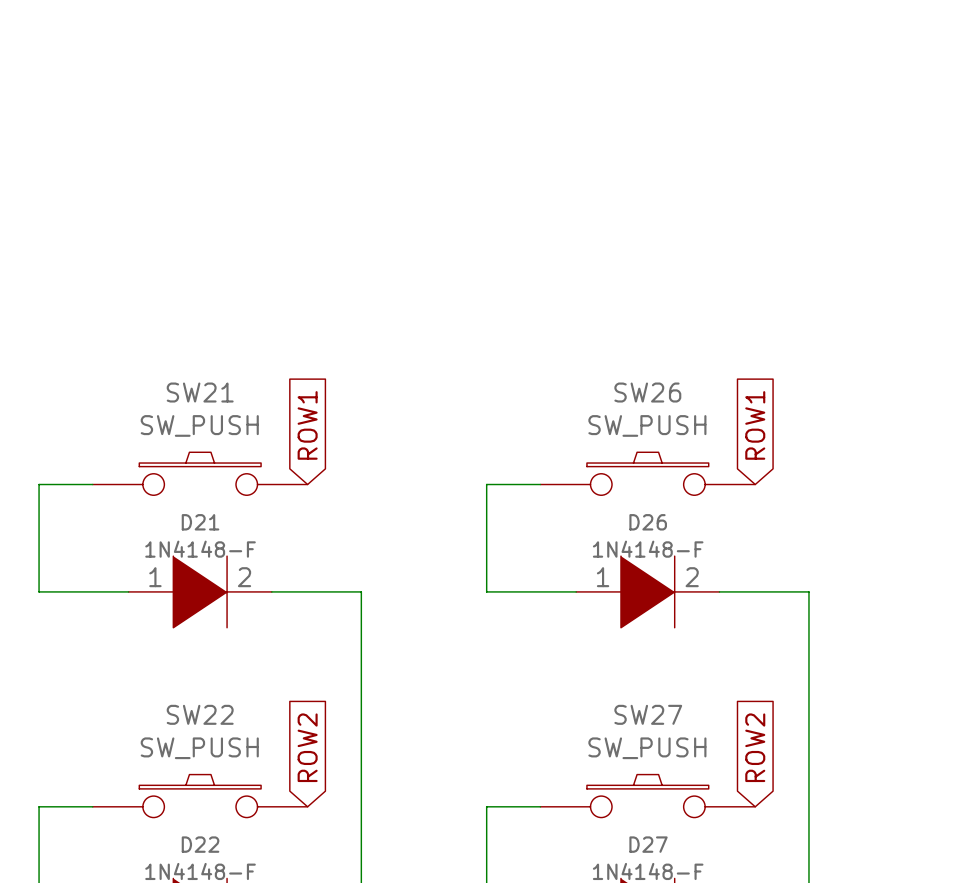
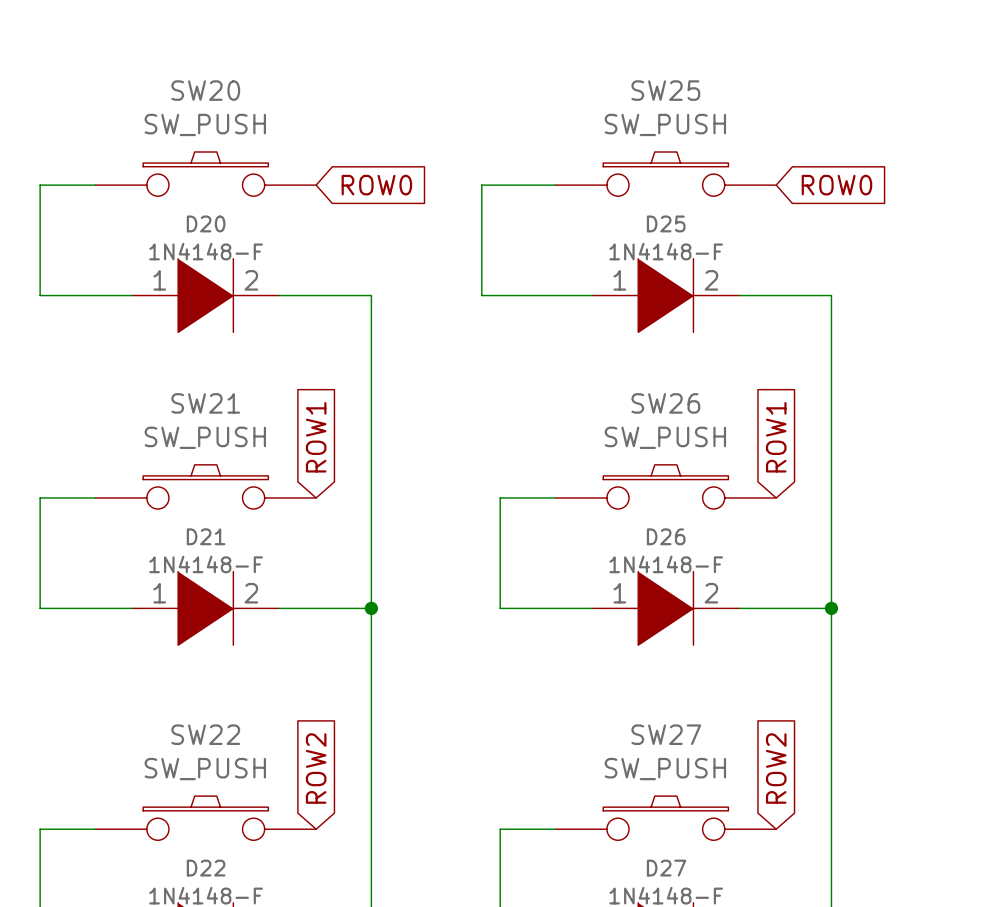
SW20: none -> SW_PUSH (205, 174)
SW25: none -> SW_PUSH (665, 174)
wire: none -> (95, 185) (40, 185) (40, 295) (132, 295)
global label: none -> ROW0 (376, 185)
wire: none -> (555, 185) (481, 185) (481, 295) (592, 295)
global label: none -> ROW0 (836, 185)
D20: none -> 1N4148-F (205, 295)
wire: none -> (279, 295) (371, 295) (371, 608)
D25: none -> 1N4148-F (665, 295)
wire: none -> (739, 295) (831, 295) (831, 608)
junction: none -> (371, 608)
junction: none -> (831, 608)

